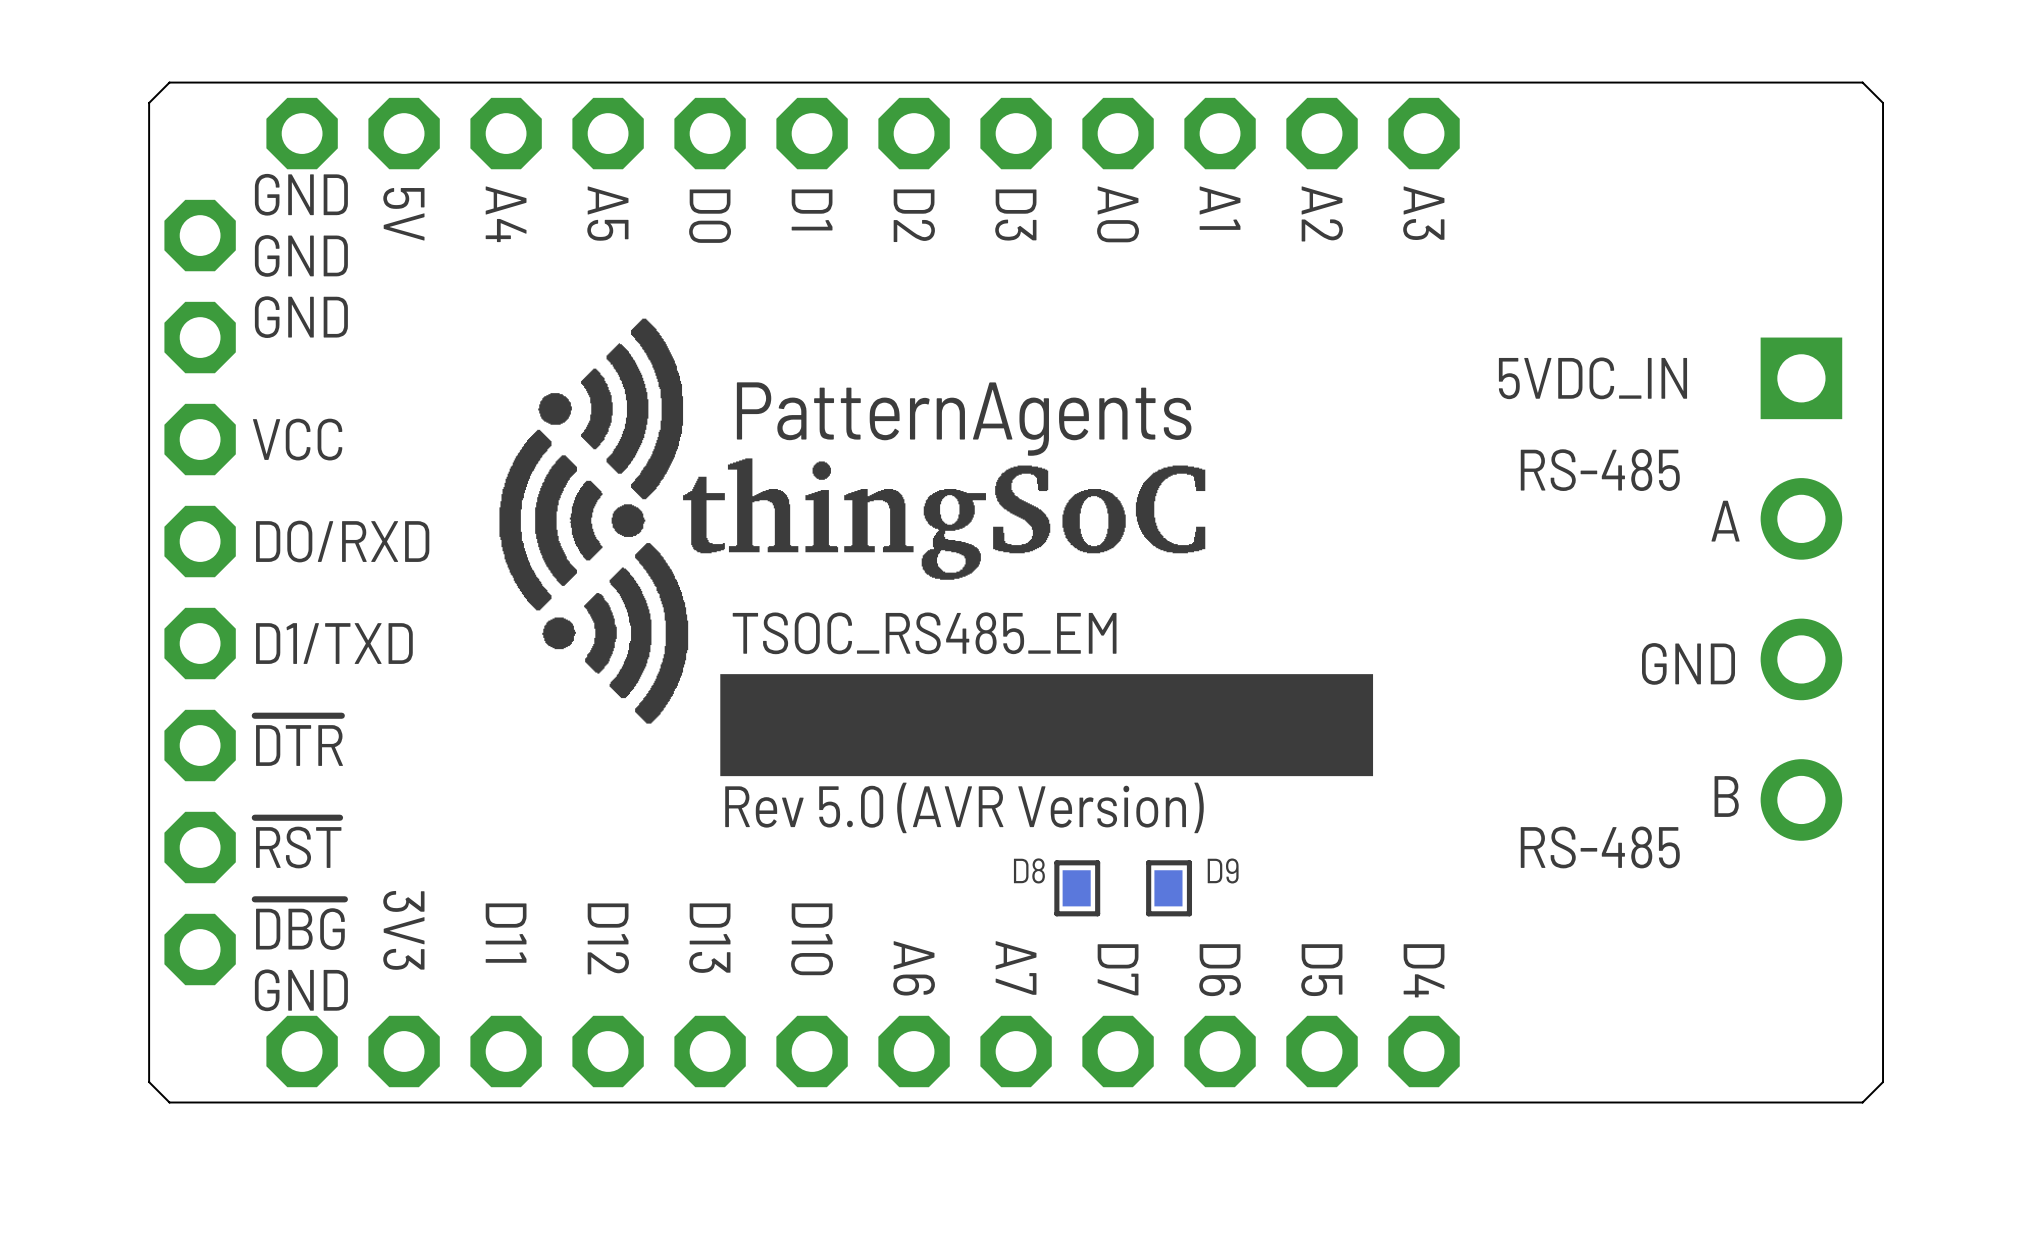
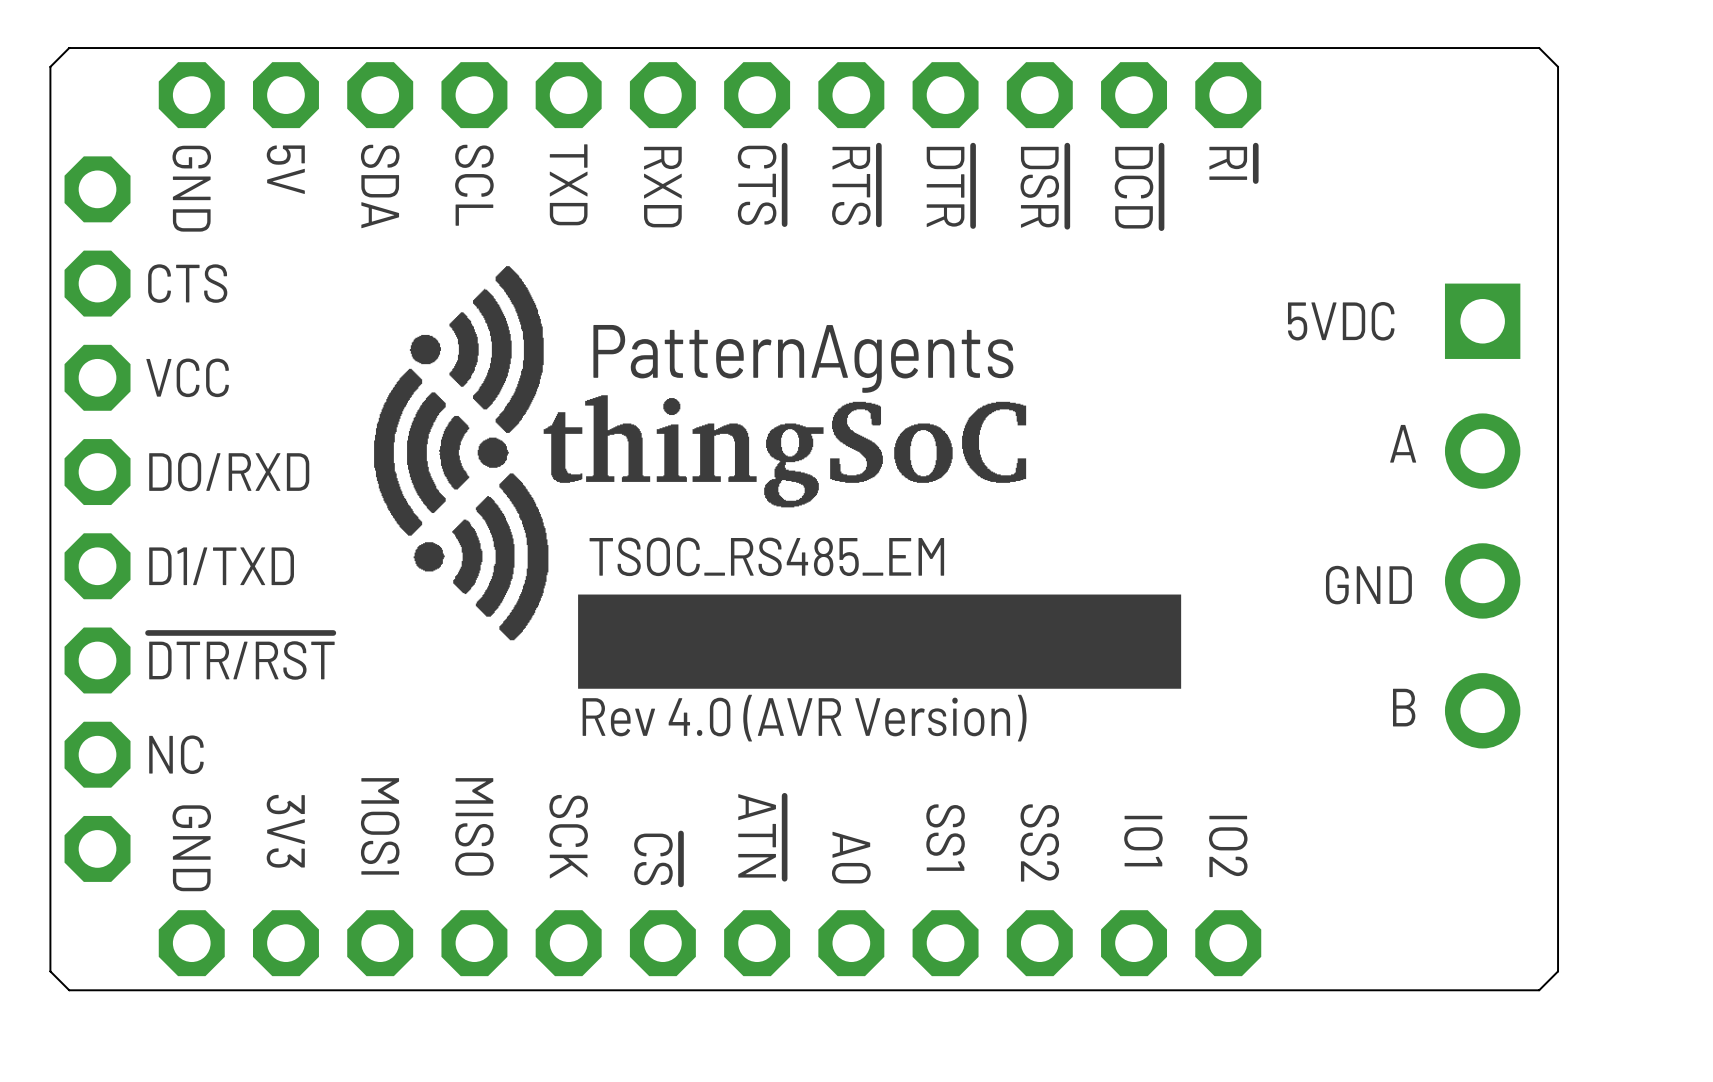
drawing: [149, 82, 1884, 1103] -> none
drawing: none -> [50, 48, 1559, 991]
text rotation: 0° (301, 194) -> 90° clockwise (191, 188)
text: A1 (1220, 208) -> ~{DSR} (1043, 186)
text: D1 (812, 209) -> RXD (662, 187)
text: A5 (607, 213) -> SCL (474, 185)
text: A2 (1322, 213) -> ~{DCD} (1138, 187)
text: A3 (1423, 213) -> ~{RI} (1232, 163)
text: A4 (506, 214) -> SDA (380, 186)
text: A0 (1118, 214) -> ~{DTR} (949, 186)
text: D2 (914, 215) -> ~{CTS} (761, 185)
text: D3 (1015, 215) -> ~{RTS} (855, 185)
text: D0 (710, 216) -> TXD (568, 184)
text: GND (301, 255) -> none
text: GND (301, 317) -> CTS (187, 283)
text: 5VDC_IN (1592, 378) -> 5VDC (1341, 321)
text: RS-485 (1600, 470) -> none
text position: A (1725, 521) -> A (1403, 443)
part position: (1801, 589) -> (1482, 516)
text position: GND (1688, 663) -> GND (1368, 585)
text: ~{DTR} (298, 740) -> ~{DTR/RST} (241, 656)
text position: B (1726, 796) -> B (1404, 707)
text: Rev 5.0 (AVR Version) (964, 807) -> Rev 4.0 (AVR Version) (804, 718)
text: ~{RST} (298, 843) -> NC (176, 754)
text: RS-485 (1600, 847) -> none
D8: (1077, 888) -> none
D9: (1169, 888) -> none
text: ~{DBG} (299, 924) -> none
text: D11 (506, 933) -> MOSI (380, 826)
text: none -> ~{ATN} (761, 836)
text: none -> SS1 (945, 837)
text: D12 (608, 938) -> MISO (474, 826)
text: D13 (709, 938) -> SCK (568, 836)
text: D10 (812, 939) -> ~{CS} (657, 859)
text: none -> SS2 (1039, 842)
text: A7 (1016, 967) -> A0 (851, 857)
text: A6 (914, 968) -> none
text: D7 (1118, 969) -> none
text: D6 (1220, 970) -> none
text: D5 (1321, 970) -> IO1 (1143, 841)
text: D4 (1424, 970) -> IO2 (1228, 846)
text rotation: 0° (301, 990) -> 90° clockwise (191, 848)

